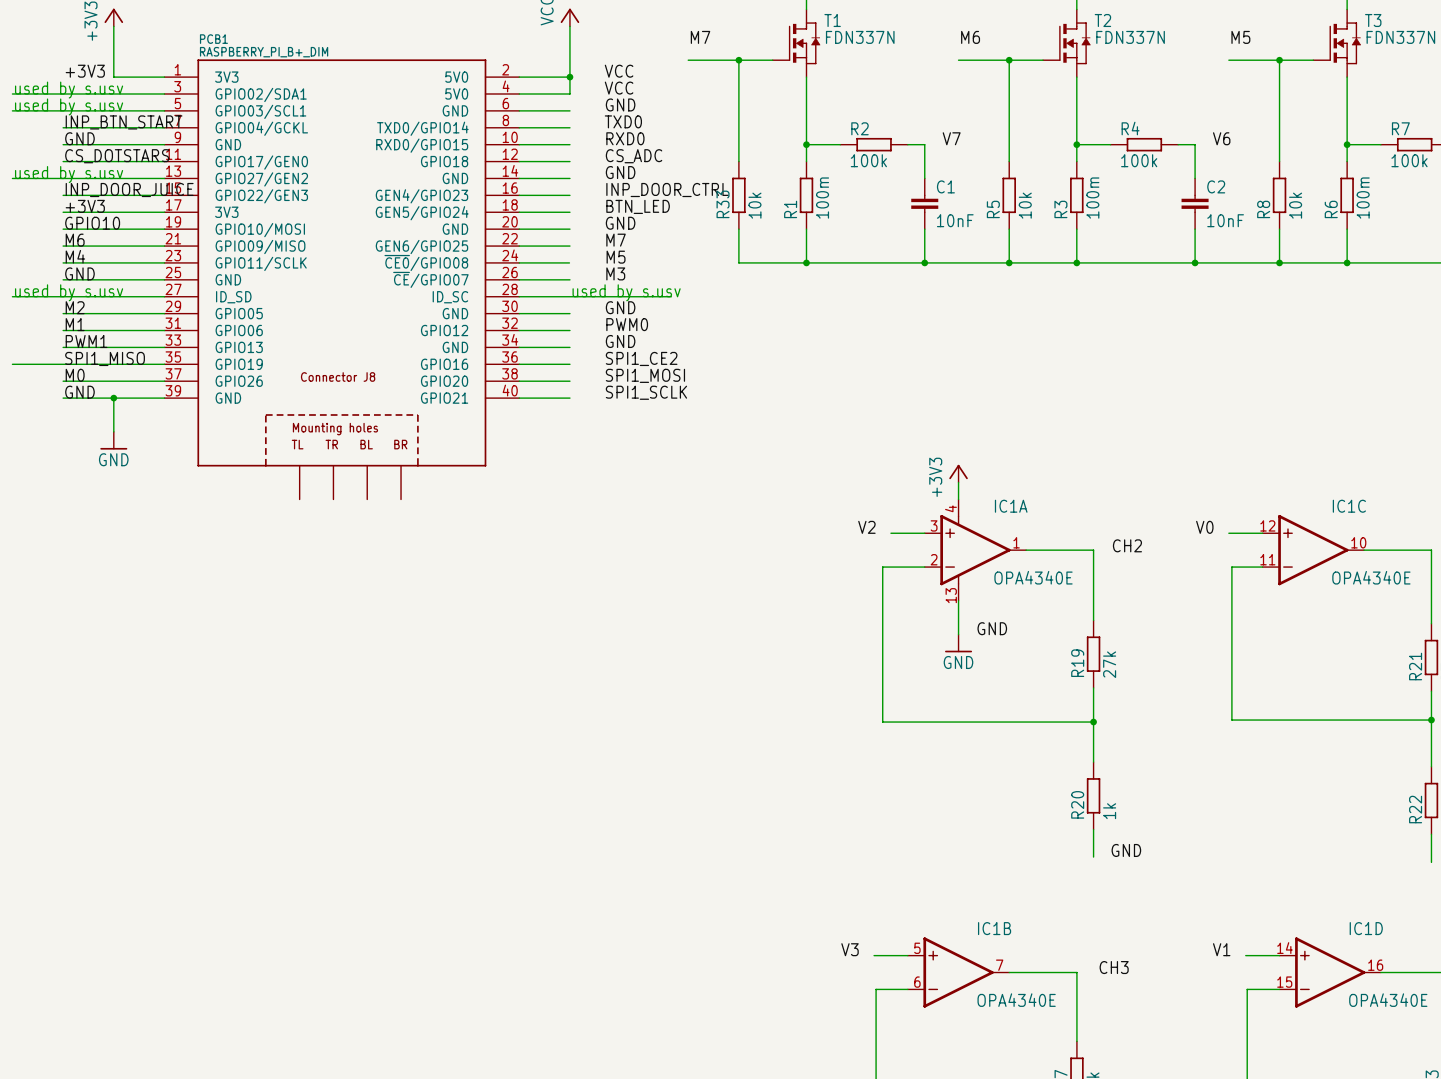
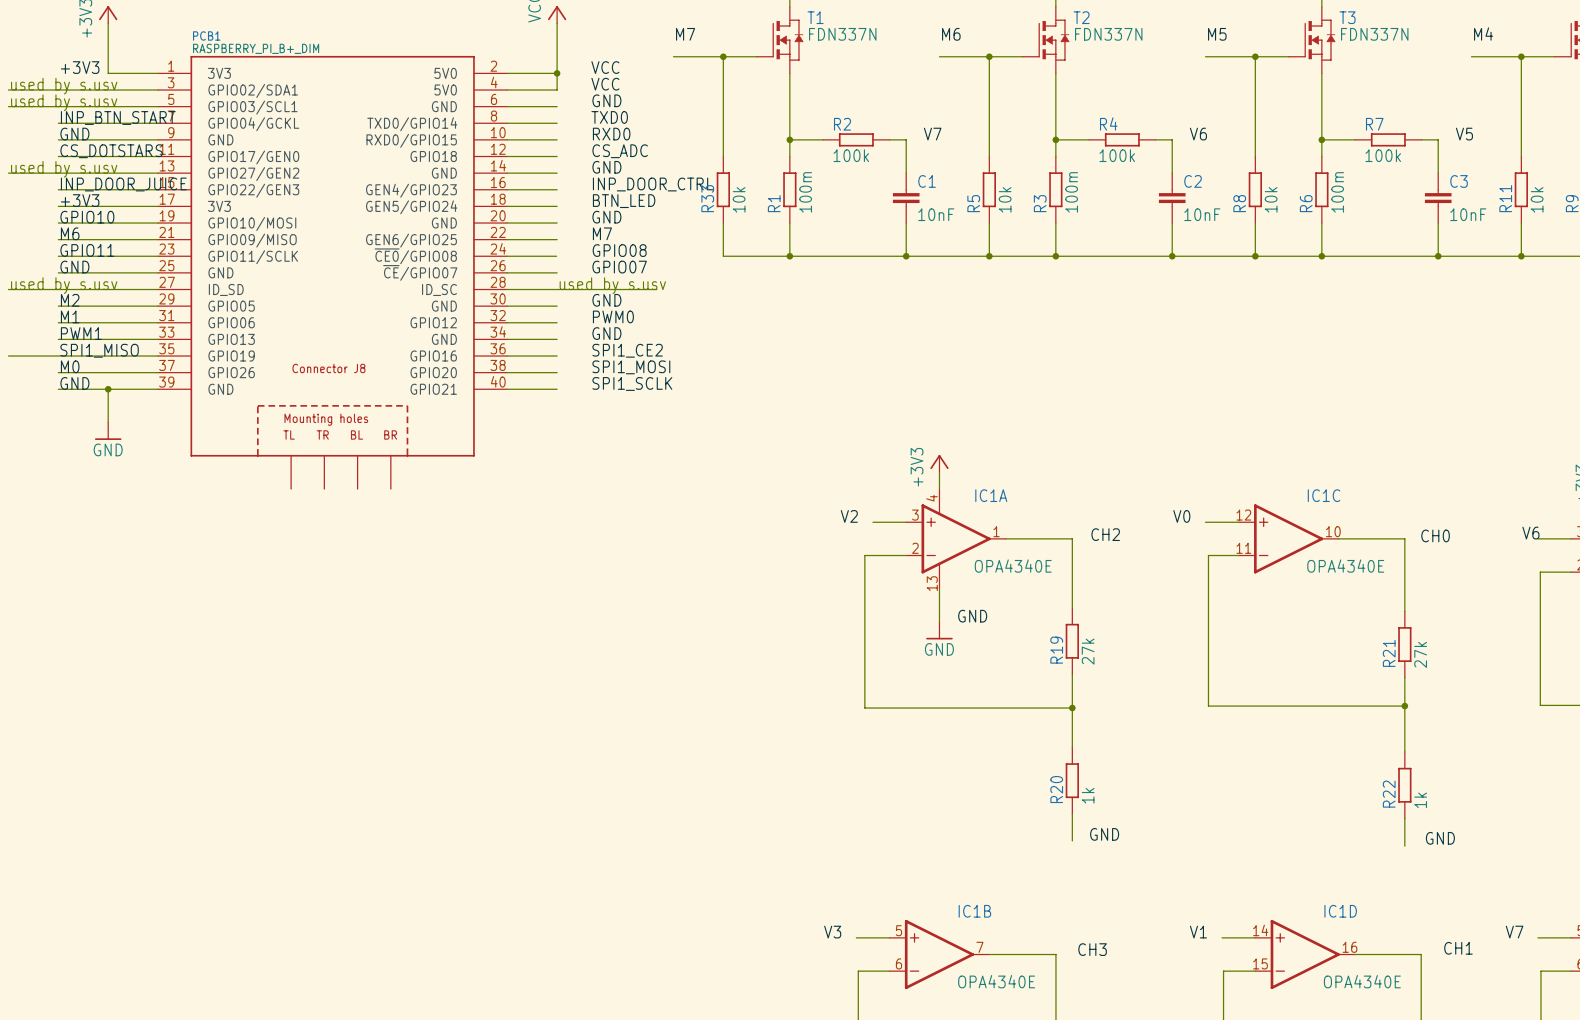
label: M4 (75, 256) -> GPIO11 (87, 250)
label: M5 (616, 257) -> GPIO08 (619, 250)
label: M3 (615, 273) -> GPIO07 (619, 267)

